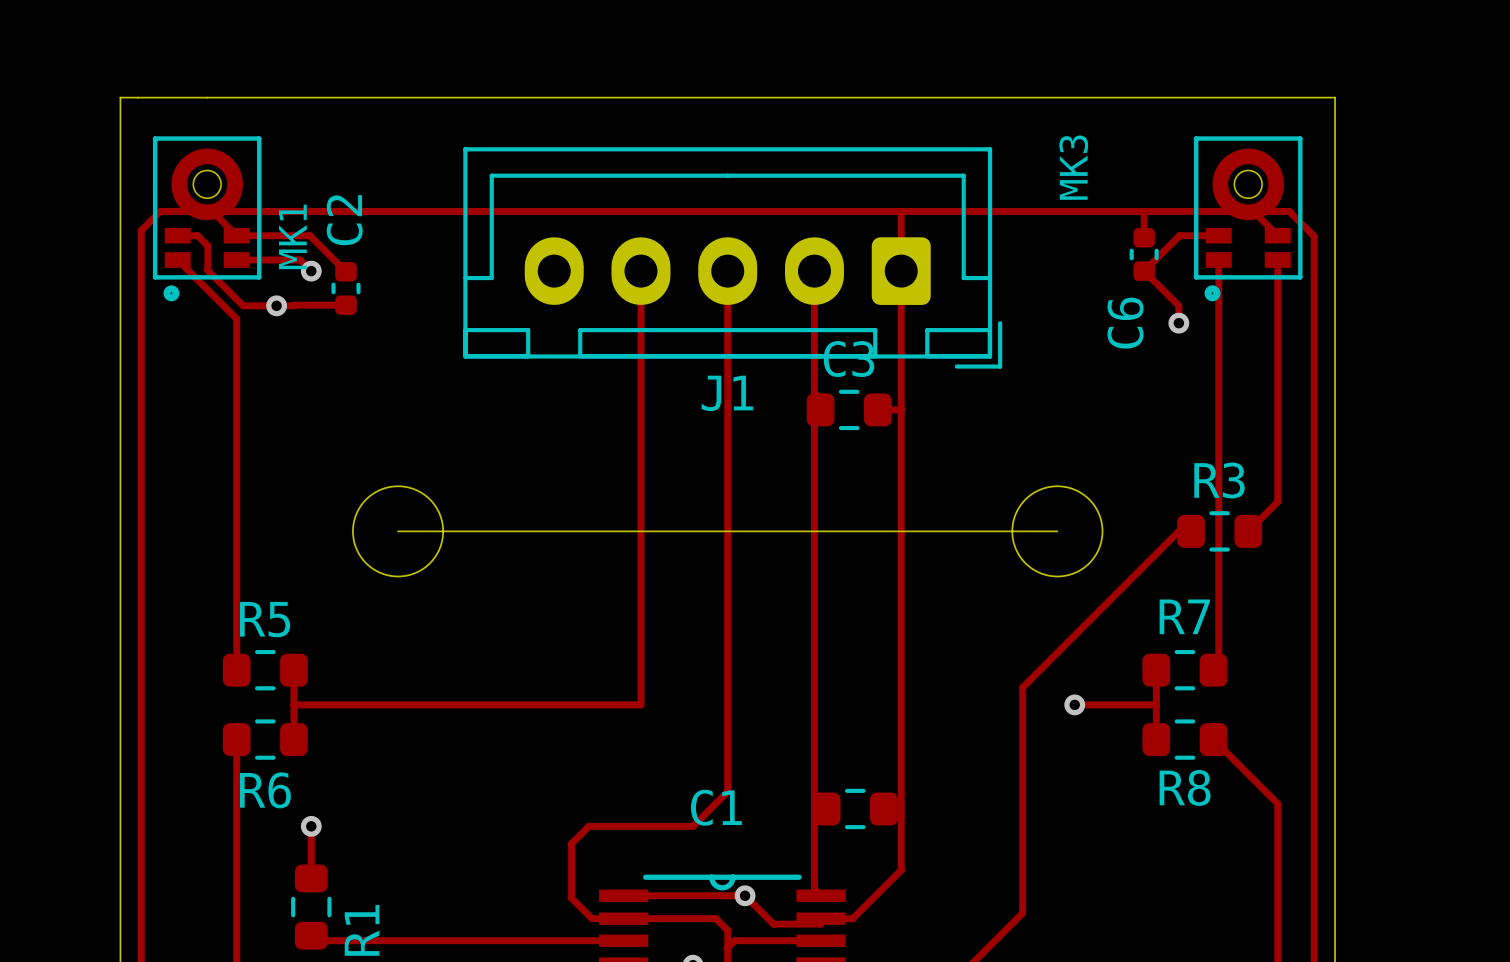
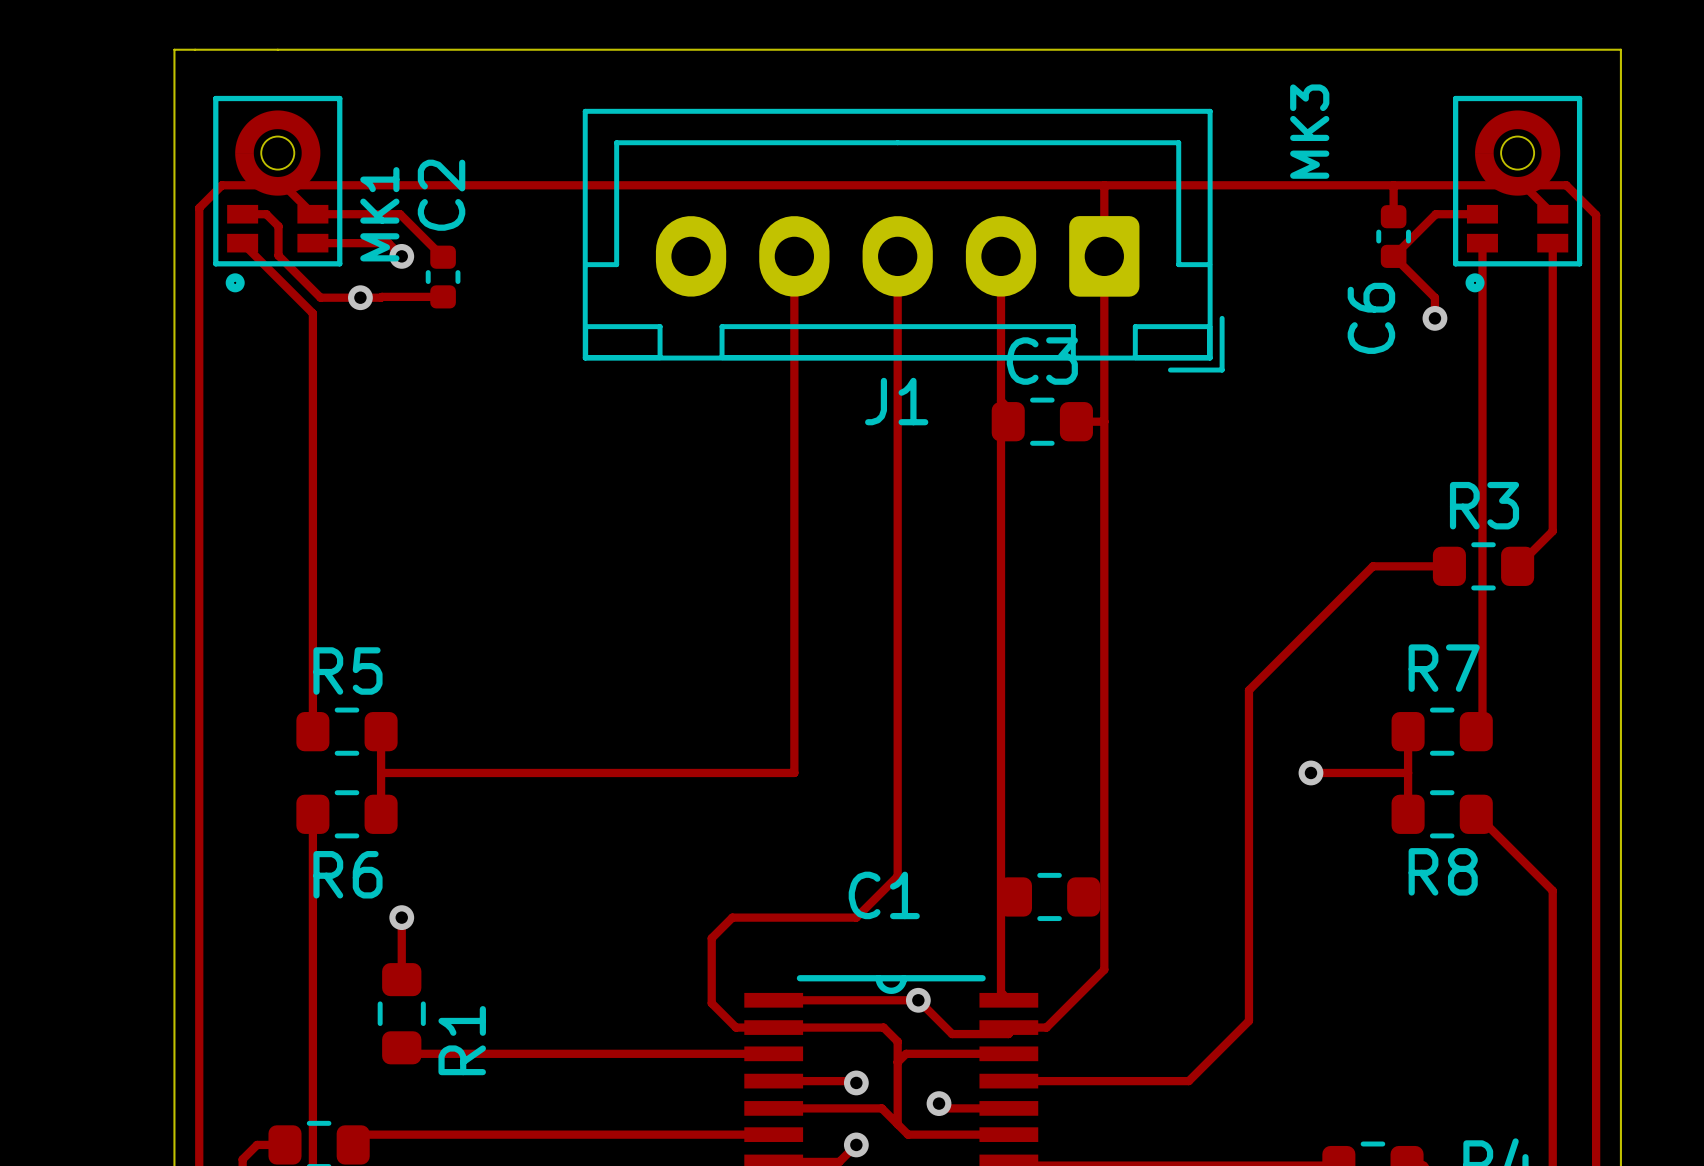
round board edge: [352, 485, 445, 578] -> none
round board edge: [1011, 485, 1104, 578] -> none
board edge: (398, 531) (1057, 531) -> none
track: (1178, 531) (1022, 687) -> (1434, 566) (1372, 566) (1248, 690) (1248, 752)

